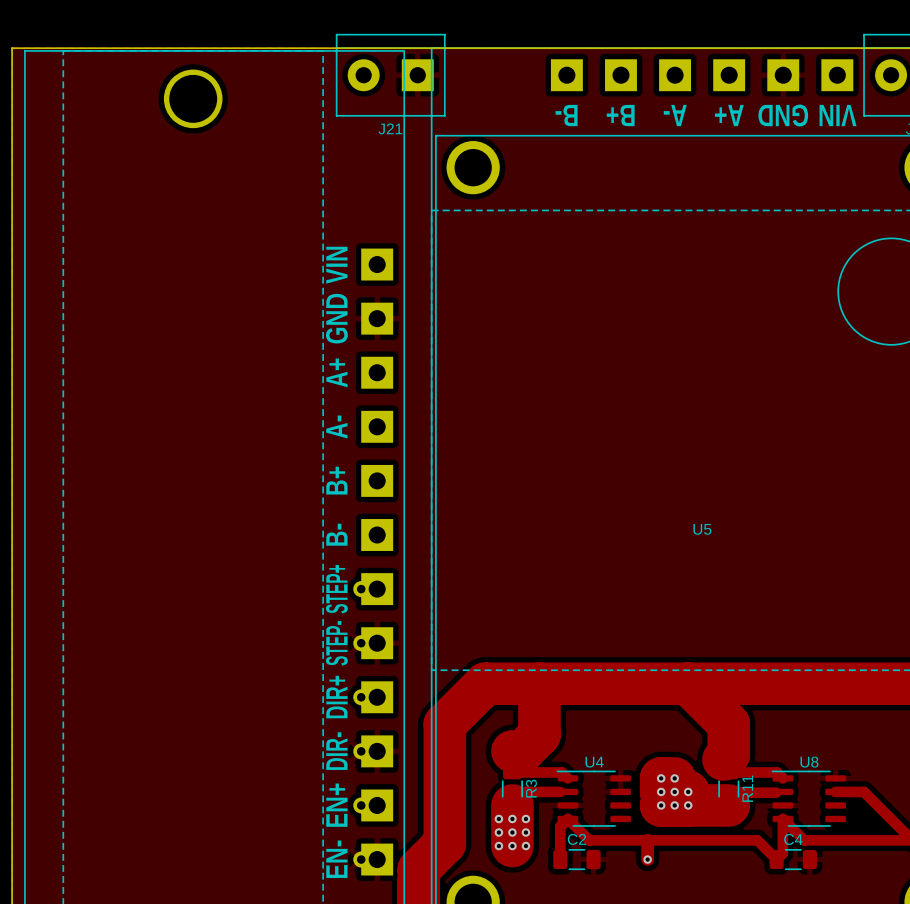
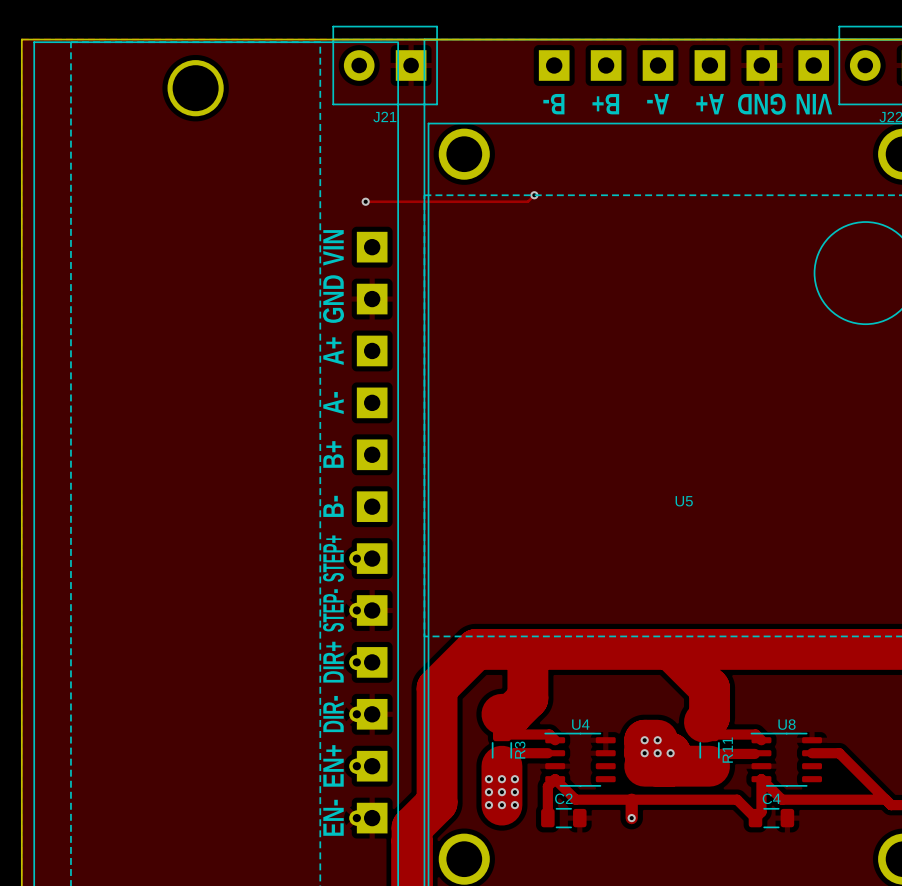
track: none -> (534, 195) (527, 201) (365, 201)
via: none -> (534, 195)
via: none -> (365, 201)
via: (661, 805) -> none
via: (674, 805) -> none
via: (688, 805) -> none

